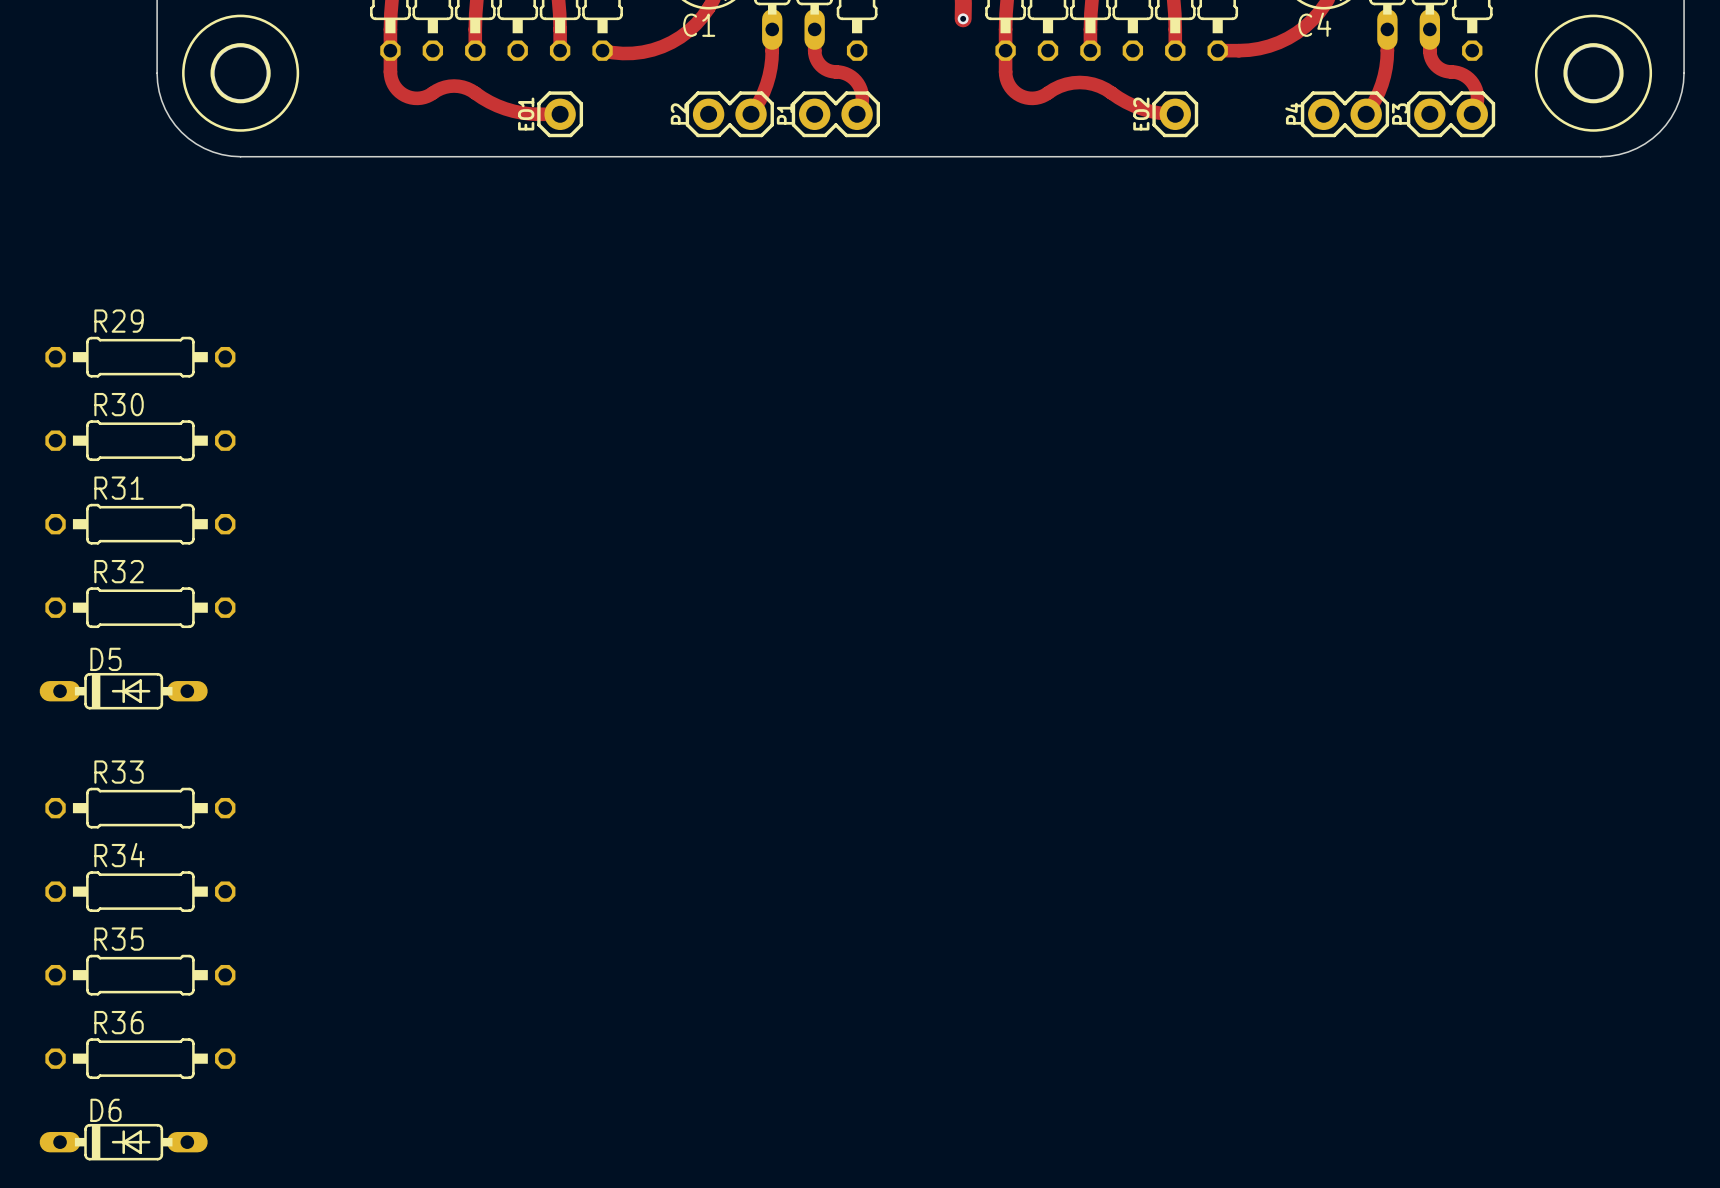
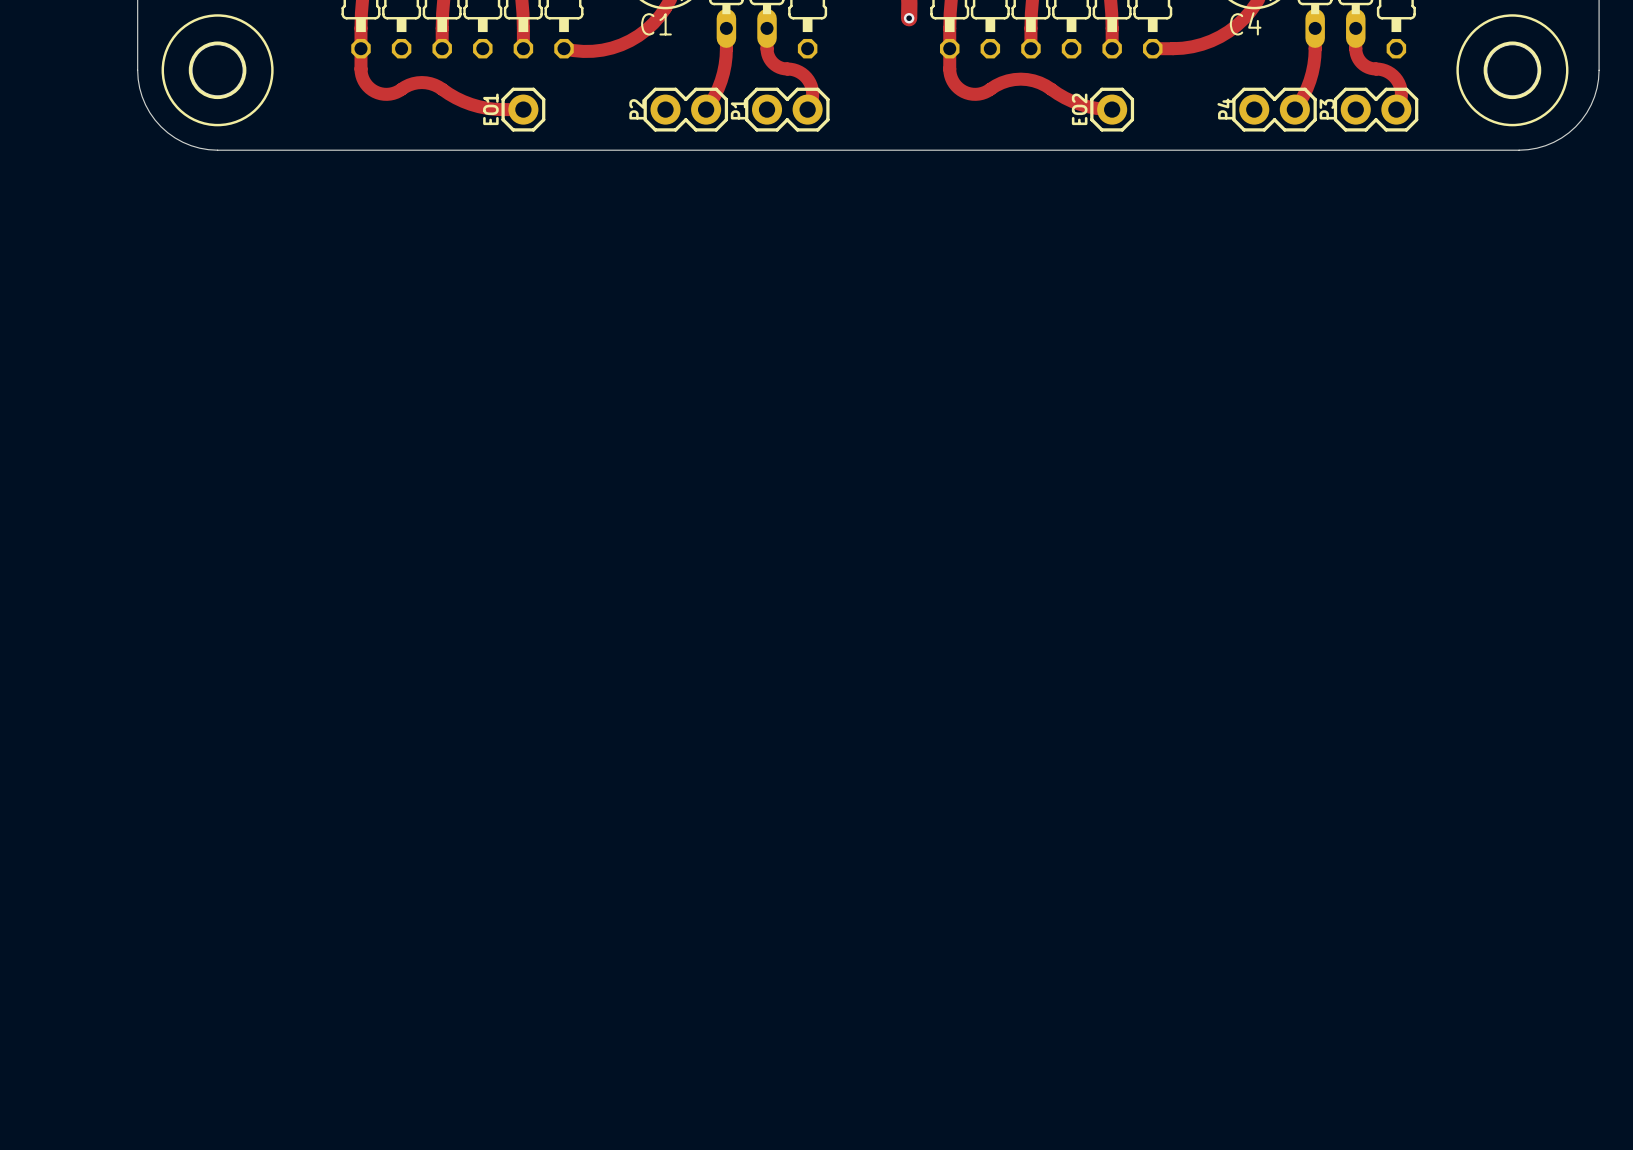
R29: (140, 357) -> none
R30: (140, 440) -> none
R31: (140, 524) -> none
R32: (140, 607) -> none
D5: (123, 691) -> none
R33: (140, 808) -> none
R34: (140, 891) -> none
R35: (140, 975) -> none
R36: (140, 1058) -> none
D6: (123, 1142) -> none

